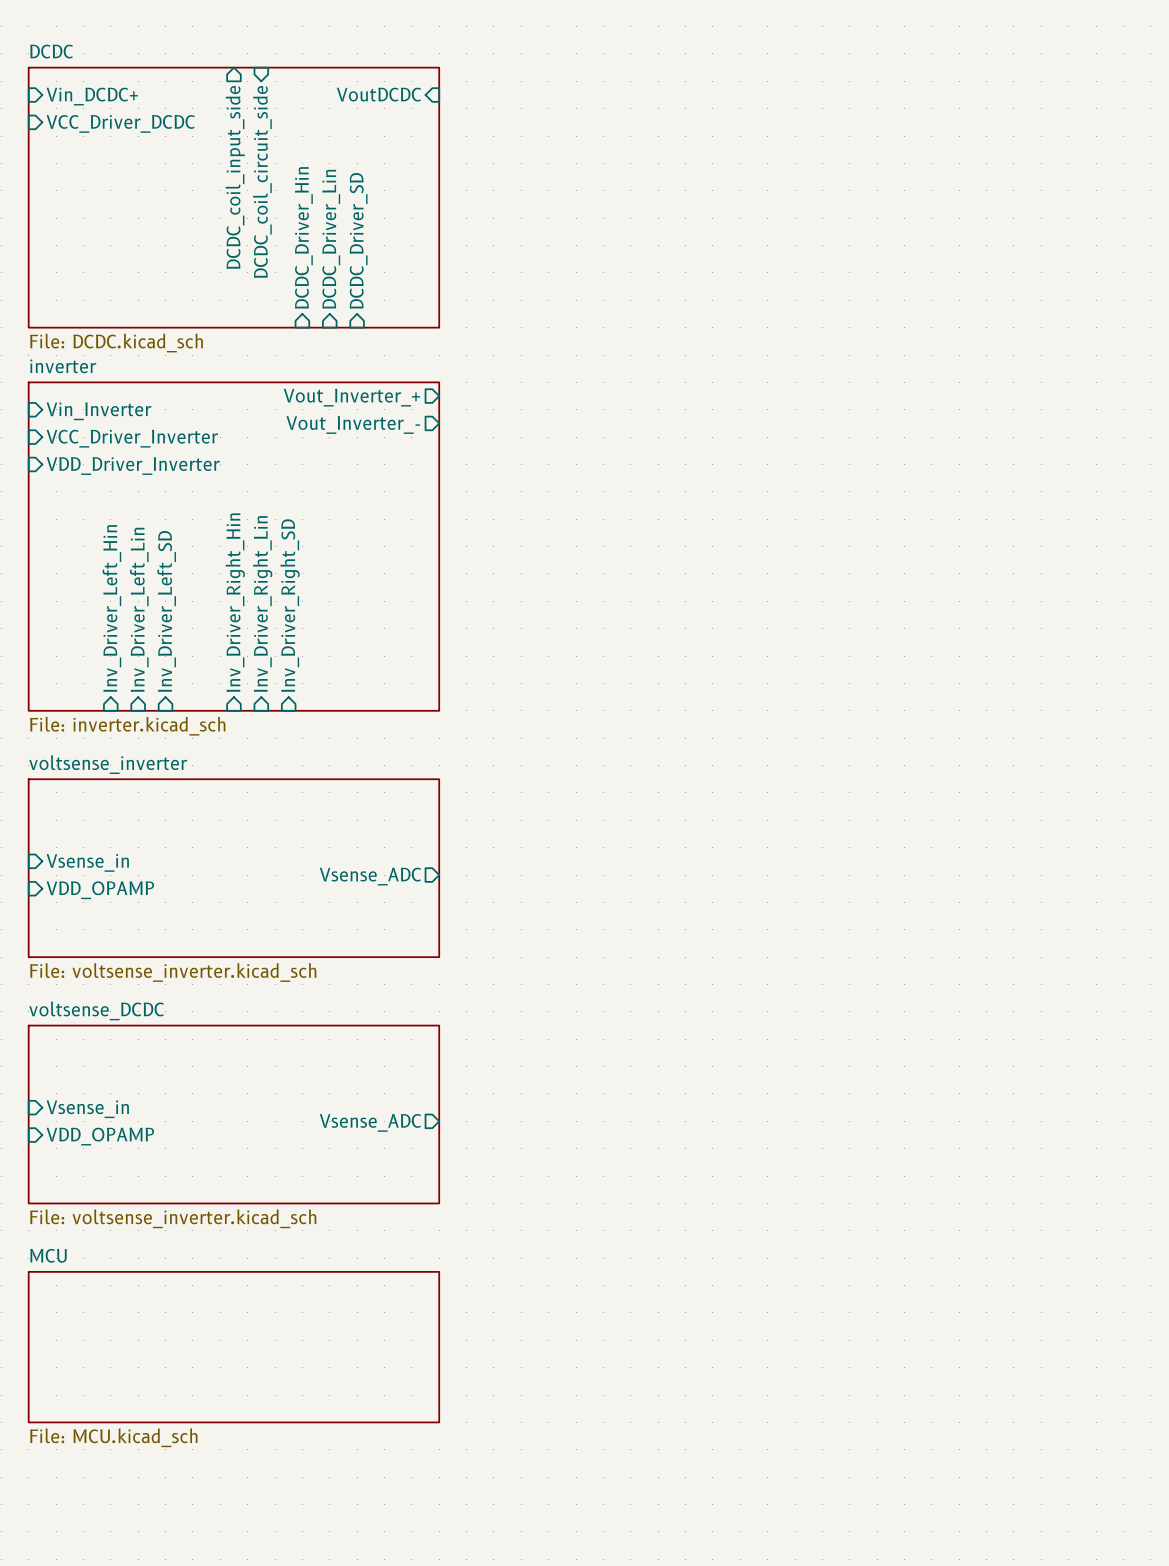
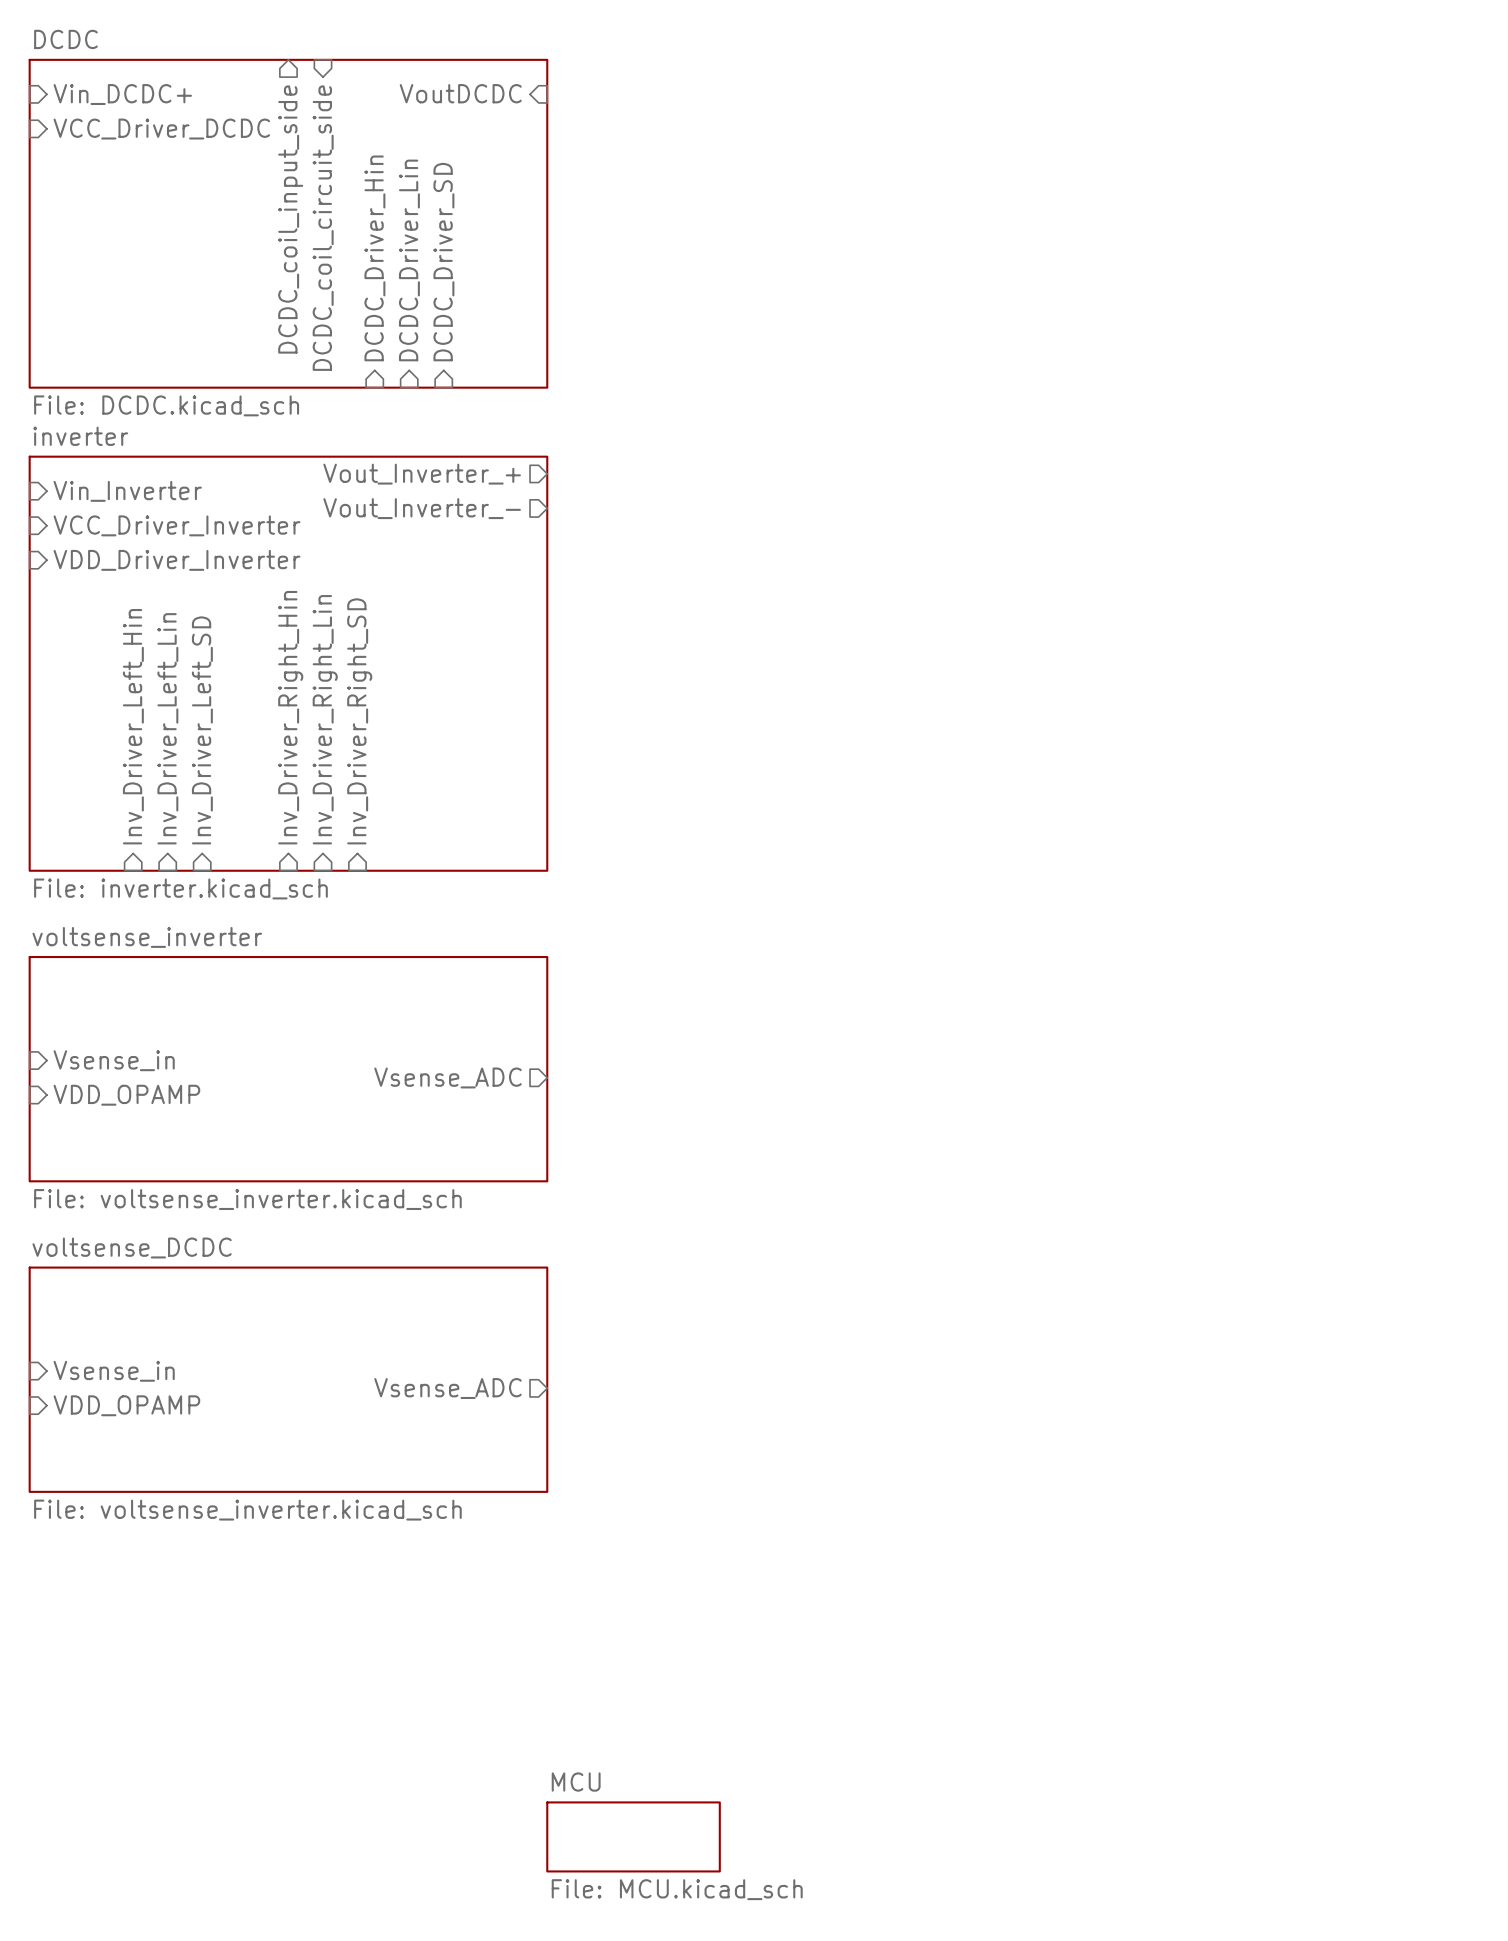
sheet MCU: File: MCU.kicad_sch (233, 1347) -> none
sheet MCU: none -> File: MCU.kicad_sch (633, 1836)

